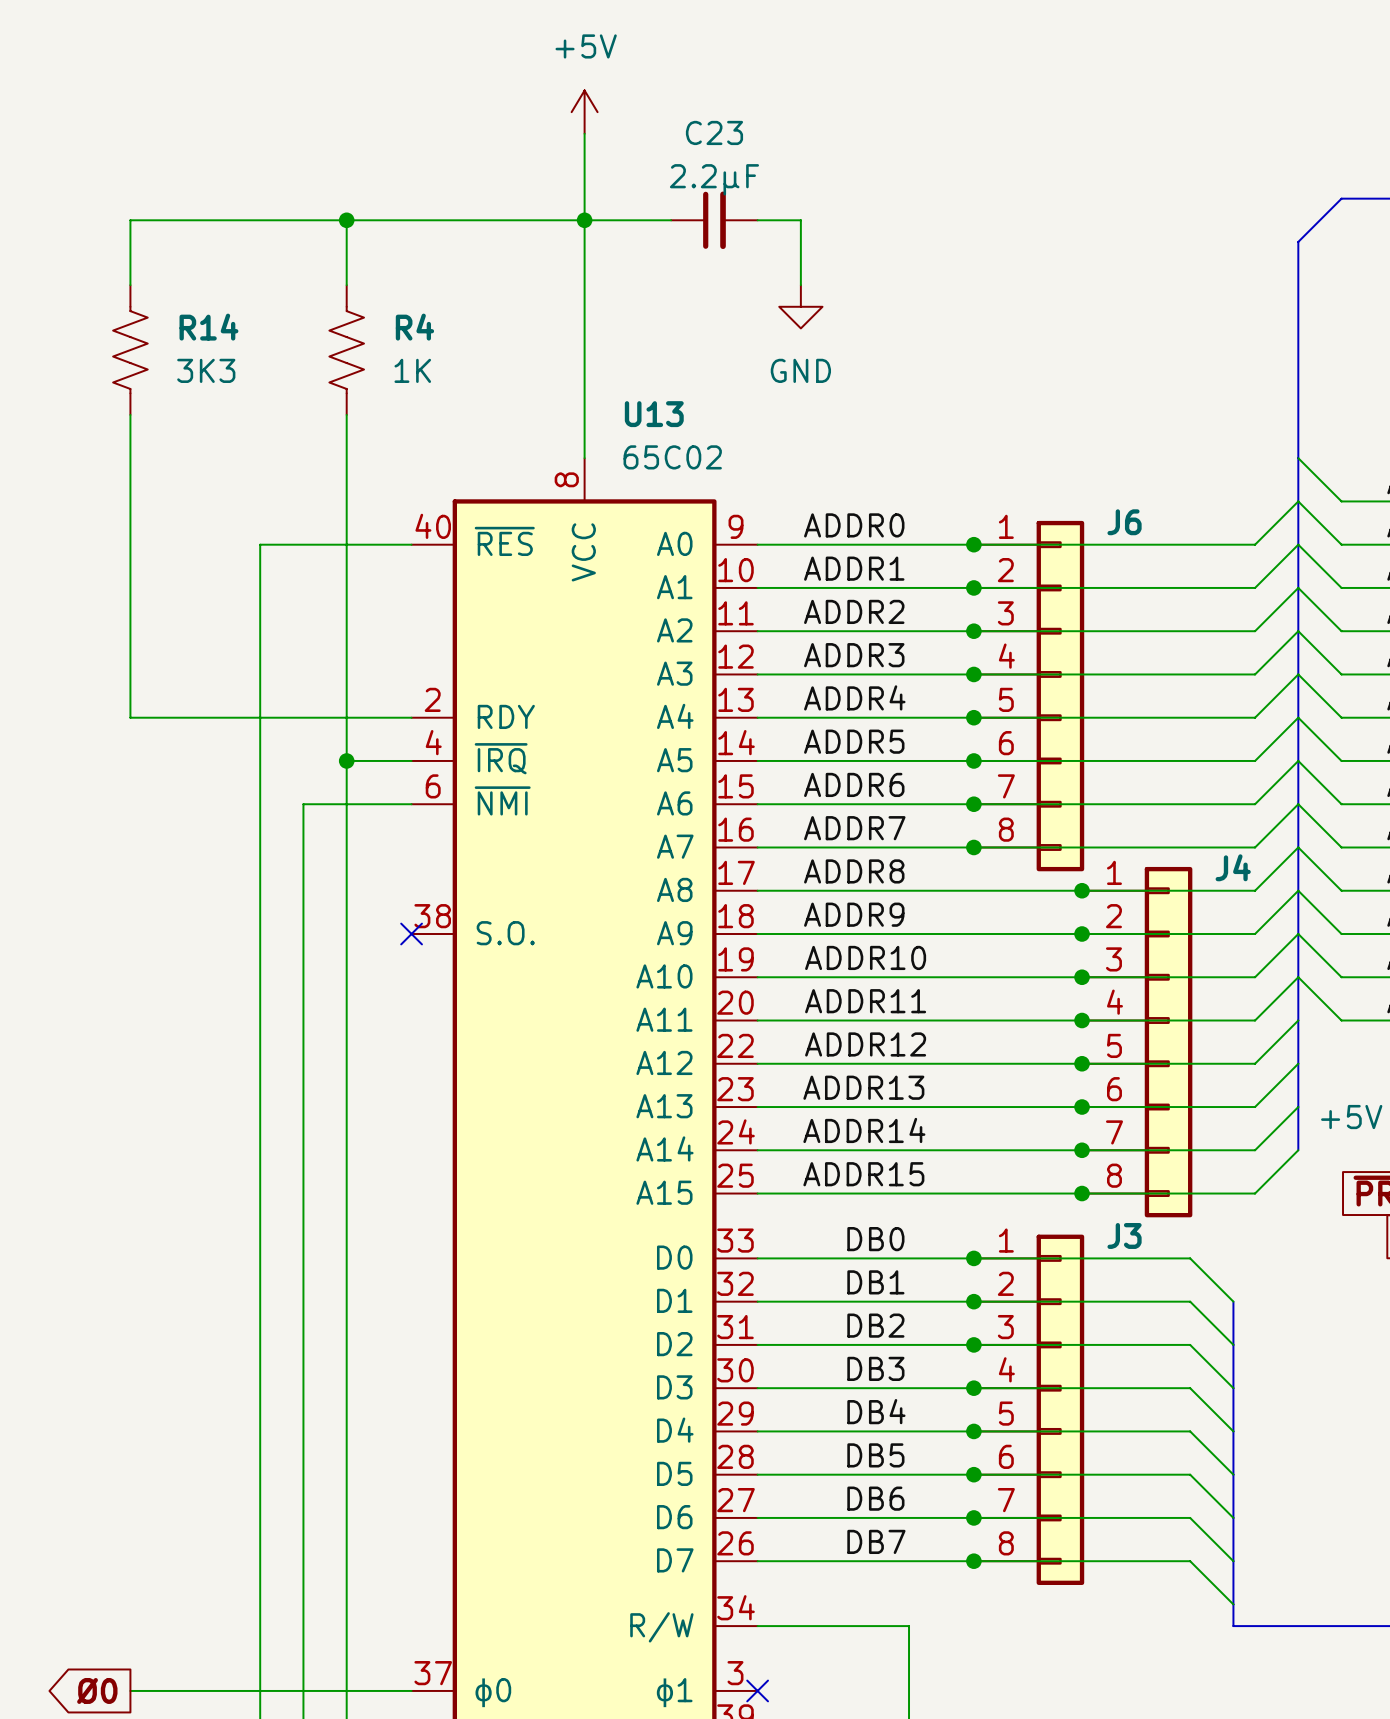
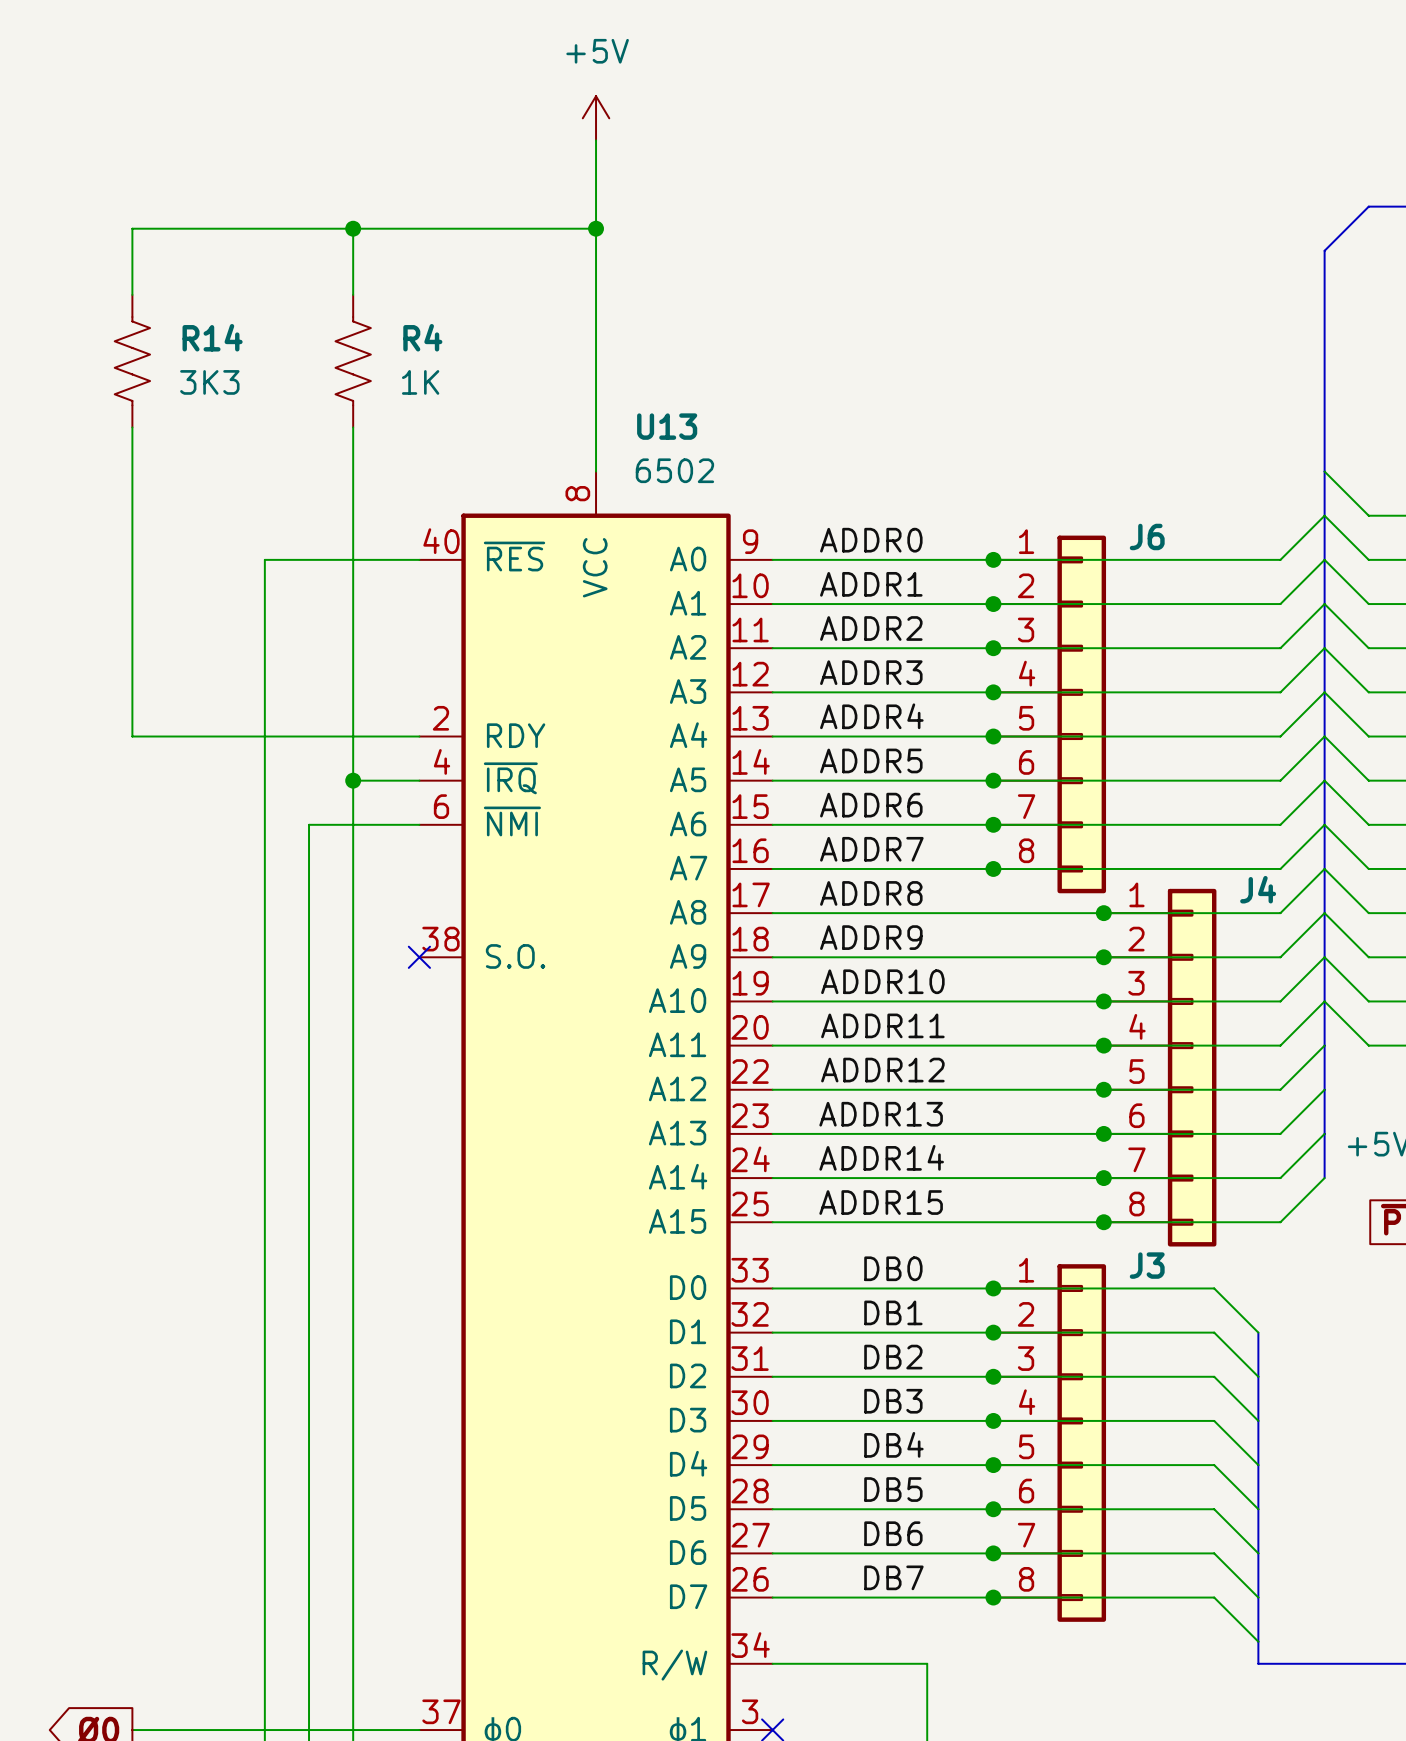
wire: (584, 220) (671, 220) -> none
C23: 2.2µF (714, 220) -> none
wire: (757, 220) (800, 220) (800, 285) -> none
power symbol: GND (800, 306) -> none
U13 value: 65C02 (672, 457) -> 6502 (674, 470)

